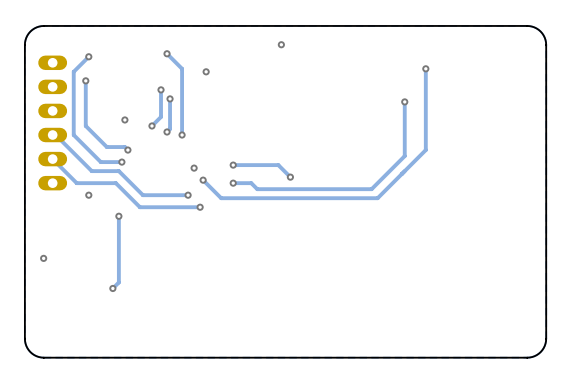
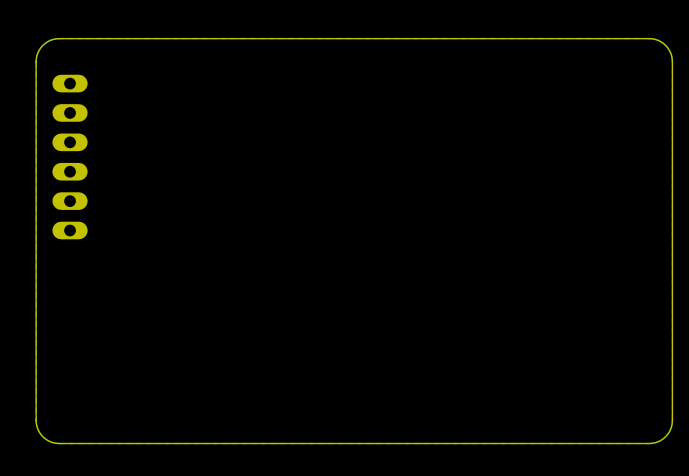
via: (281, 44) -> none
track: (167, 53) (182, 68) (182, 135) -> none
via: (167, 53) -> none
track: (88, 56) (73, 71) (73, 135) (100, 162) (121, 162) -> none
via: (88, 56) -> none
track: (425, 68) (425, 150) (377, 198) (221, 198) (203, 180) -> none
via: (425, 68) -> none
via: (206, 71) -> none
track: (85, 80) (85, 125) (106, 147) (124, 147) (127, 150) -> none
via: (85, 80) -> none
track: (161, 89) (161, 116) (151, 125) -> none
via: (161, 89) -> none
track: (170, 98) (170, 128) (167, 132) -> none
via: (170, 98) -> none
track: (404, 101) (404, 156) (371, 189) (257, 189) (251, 183) (233, 183) -> none
via: (404, 101) -> none
via: (124, 119) -> none
via: (151, 125) -> none
via: (167, 132) -> none
track: (52, 135) (55, 135) (91, 171) (118, 171) (142, 195) (188, 195) -> none
via: (182, 135) -> none
via: (127, 150) -> none
track: (52, 159) (76, 183) (115, 183) (139, 207) (200, 207) -> none
via: (121, 162) -> none
track: (233, 165) (278, 165) (290, 177) -> none
via: (233, 165) -> none
via: (194, 168) -> none
via: (290, 177) -> none
via: (203, 180) -> none
via: (233, 183) -> none
via: (88, 195) -> none
via: (188, 195) -> none
via: (200, 207) -> none
track: (118, 216) (118, 282) (112, 288) -> none
via: (118, 216) -> none
via: (43, 258) -> none
via: (112, 288) -> none

